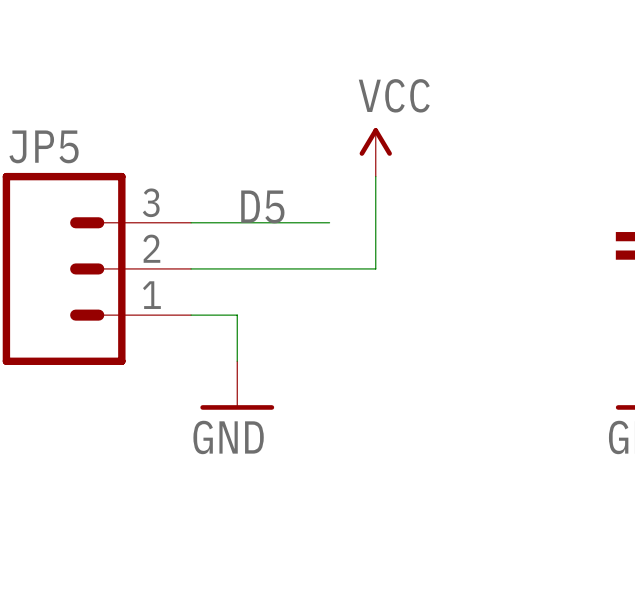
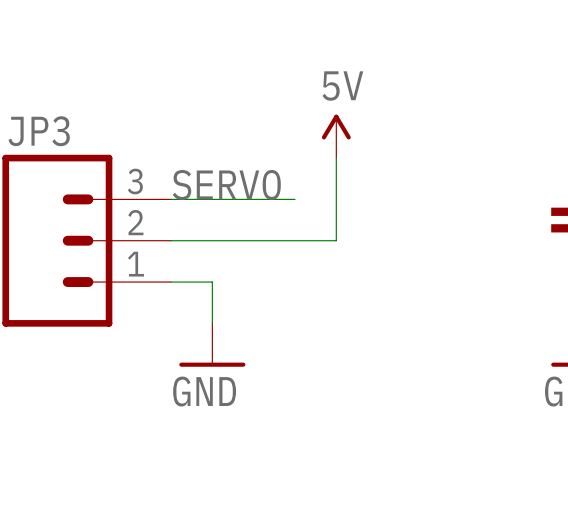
JP5 name: JP5 (44, 146) -> JP3 (39, 131)
power symbol: VCC (375, 152) -> 5V (336, 136)
label: none -> SERVO (226, 184)
label: D5 (262, 206) -> none

